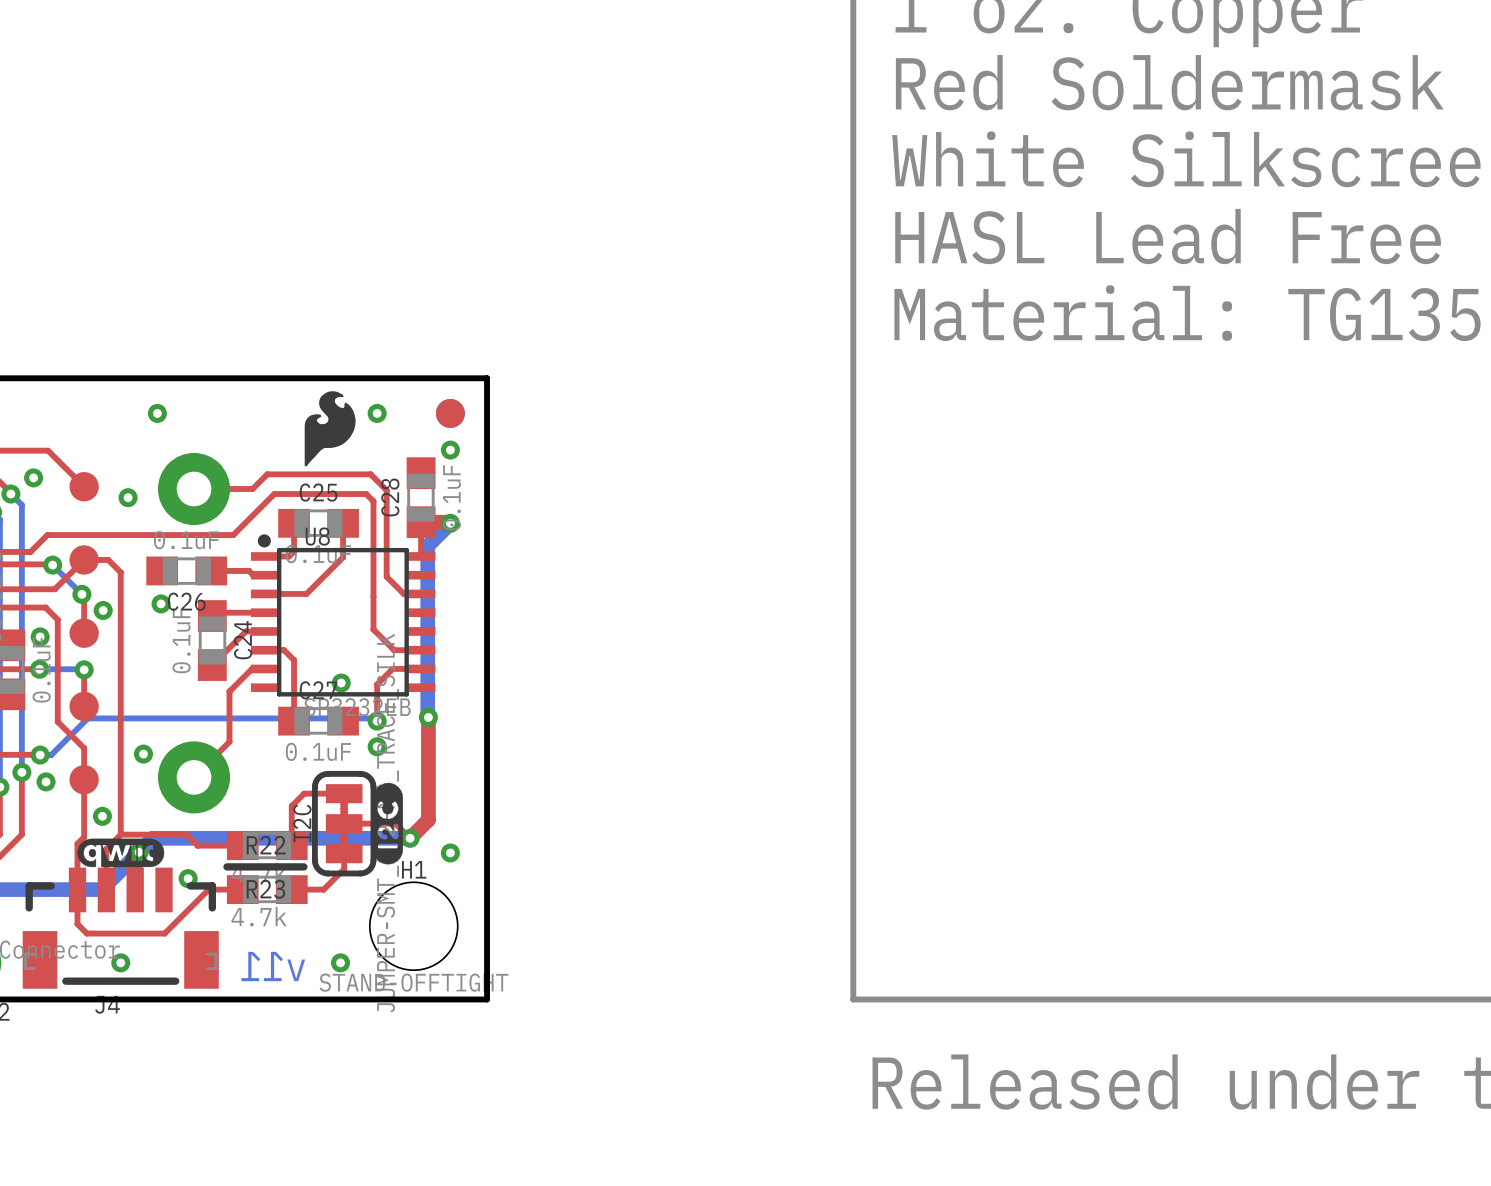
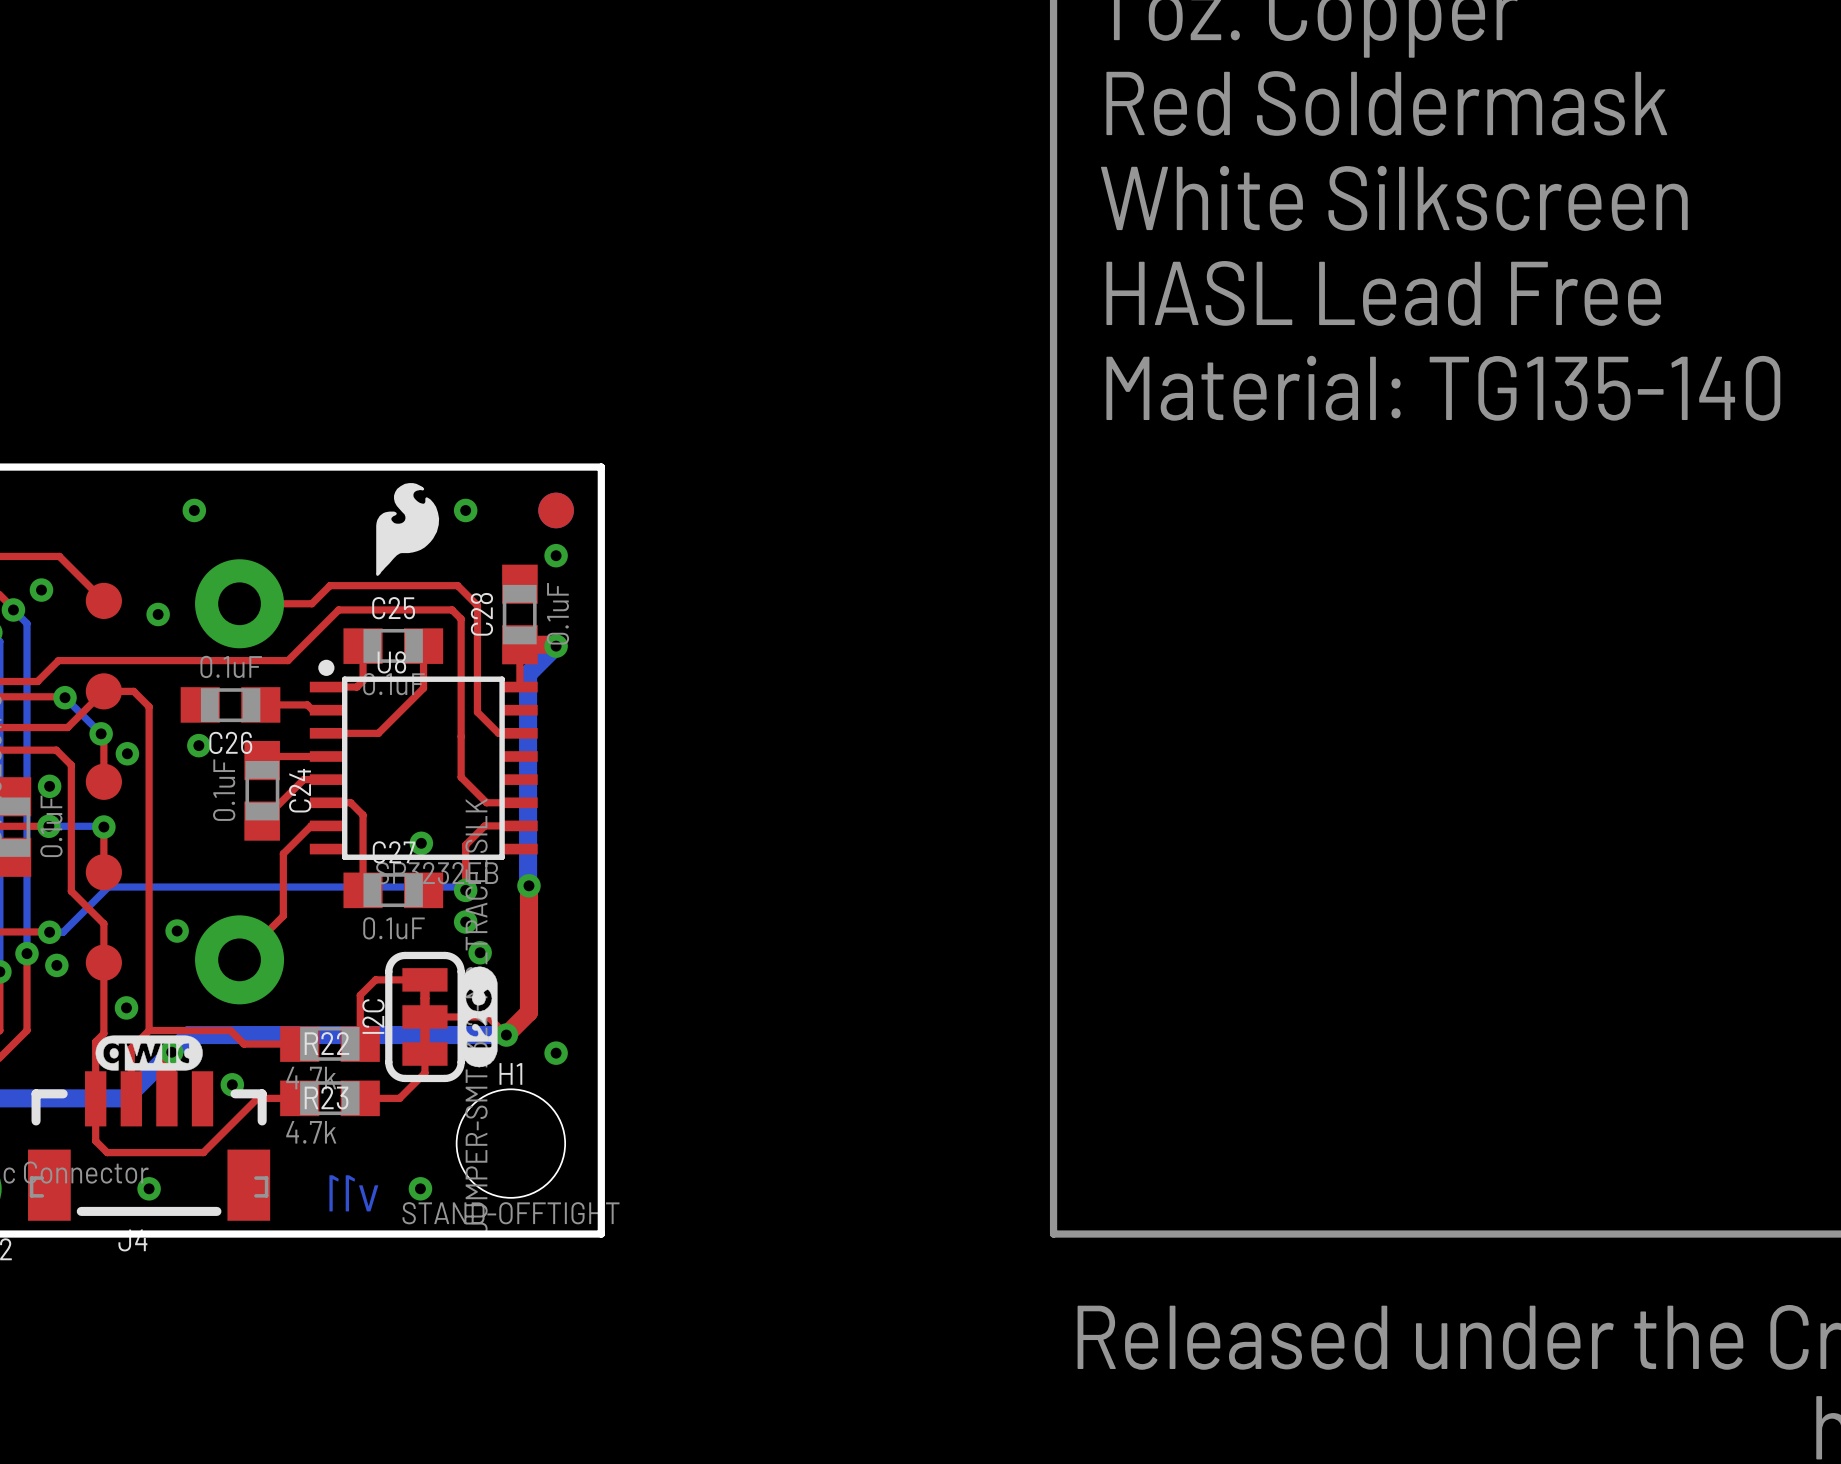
via: none -> (480, 952)
line: (226, 866) (303, 866) -> none

